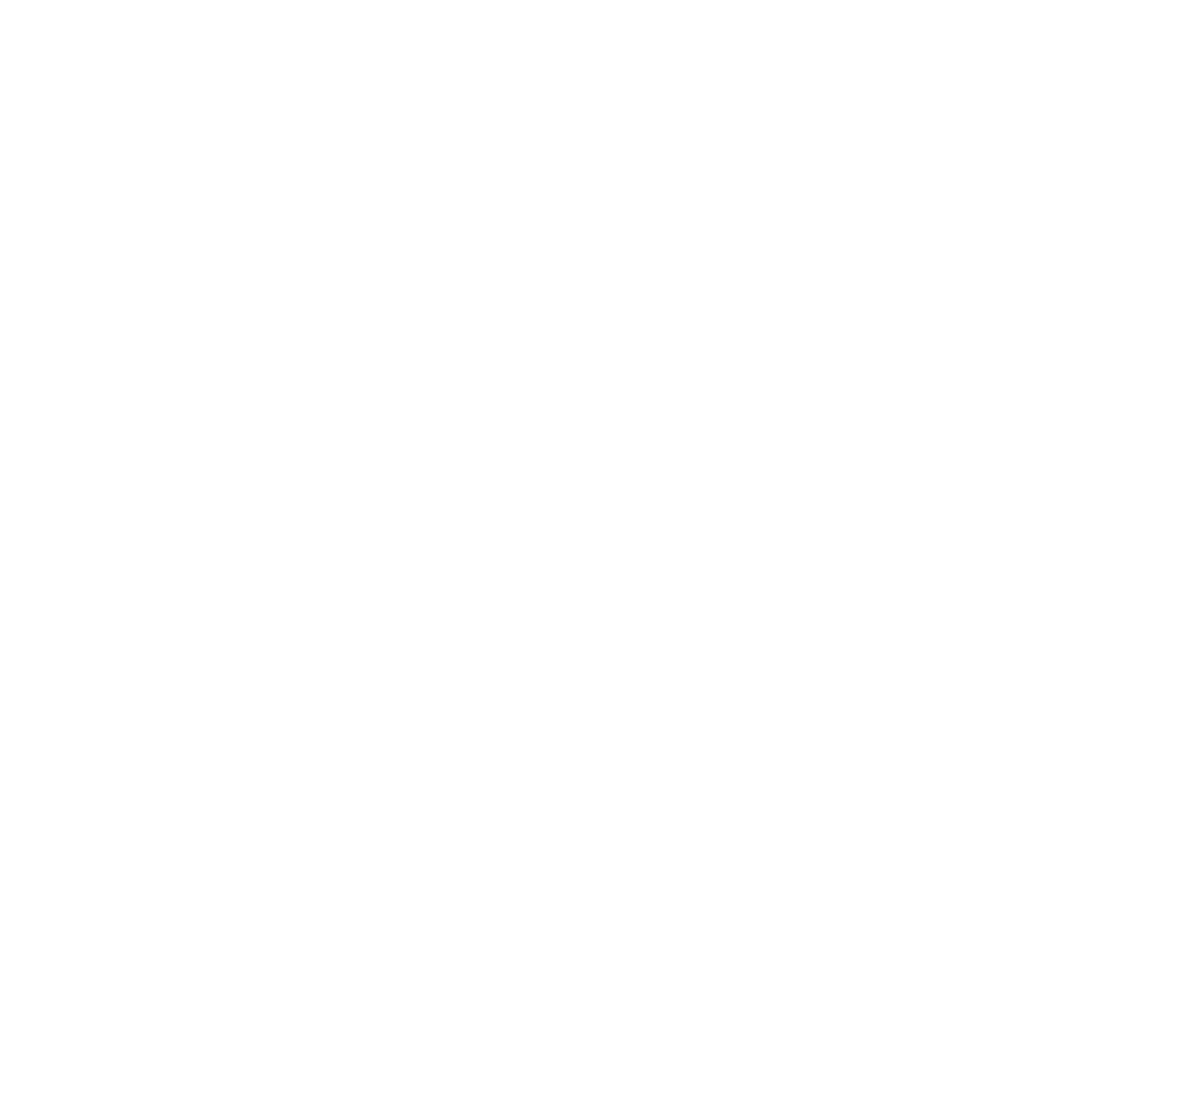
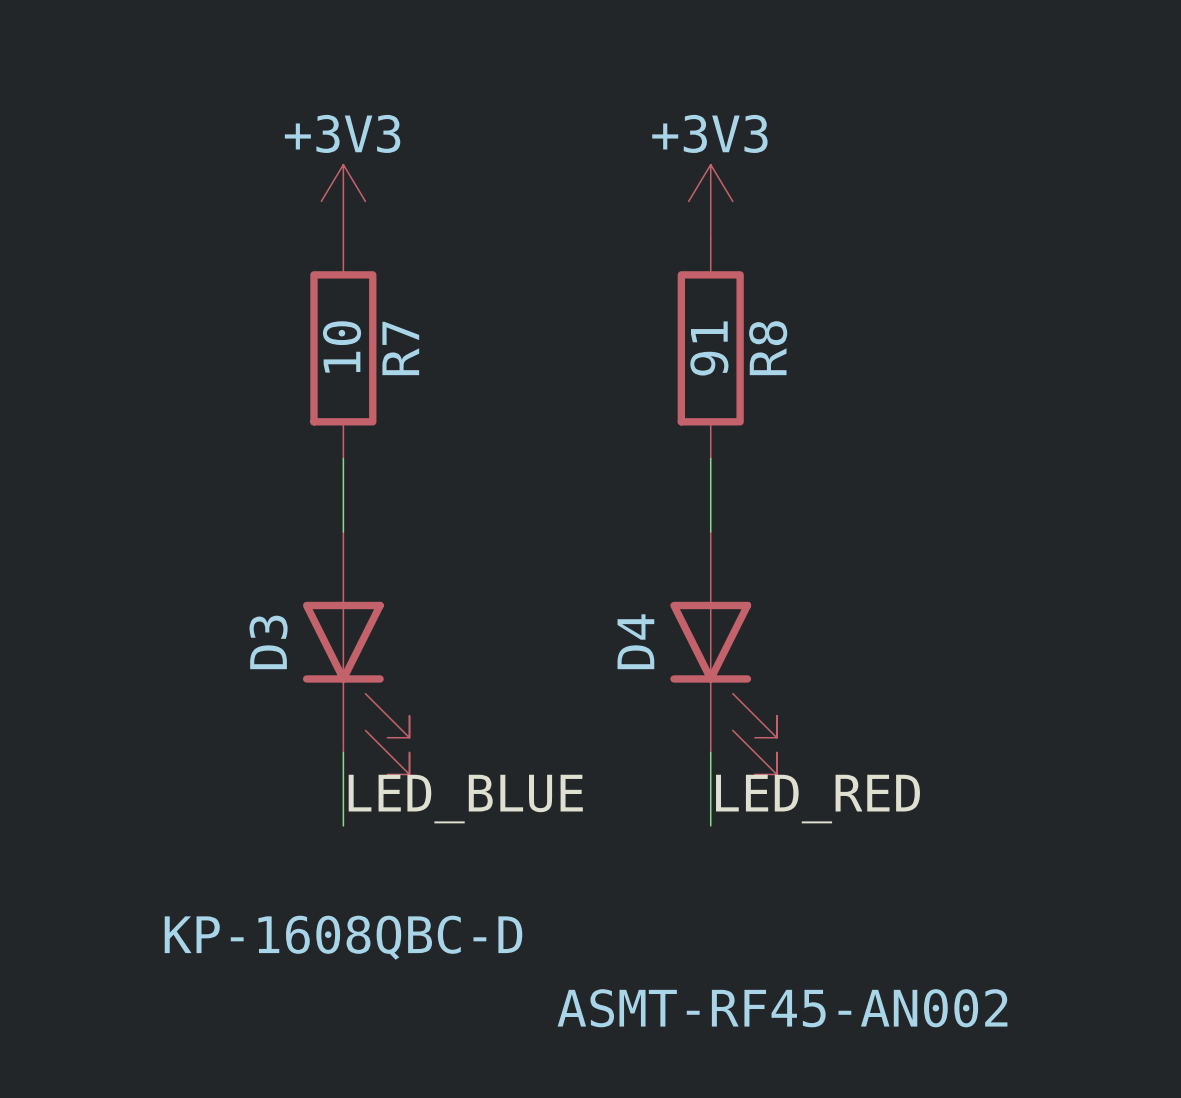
power symbol: none -> +3V3 (343, 201)
power symbol: none -> +3V3 (710, 201)
R7: none -> 10 (343, 348)
R8: none -> 91 (710, 348)
wire: none -> (343, 458) (343, 532)
wire: none -> (710, 458) (710, 532)
D3: none -> KP-1608QBC-D (356, 653)
D4: none -> ASMT-RF45-AN002 (723, 653)
wire: none -> (343, 752) (343, 825)
wire: none -> (710, 752) (710, 825)
label: none -> LED_BLUE (465, 799)
label: none -> LED_RED (817, 799)

